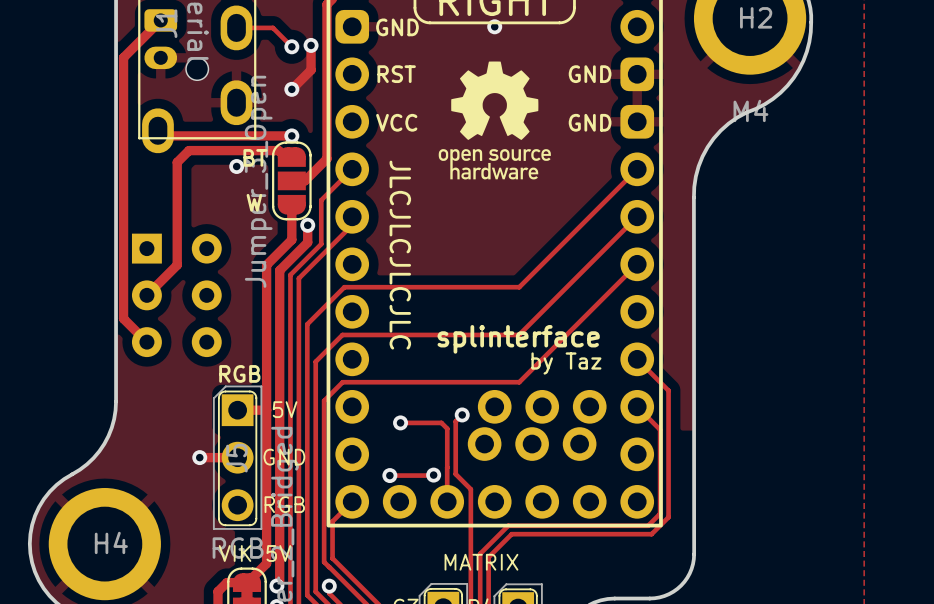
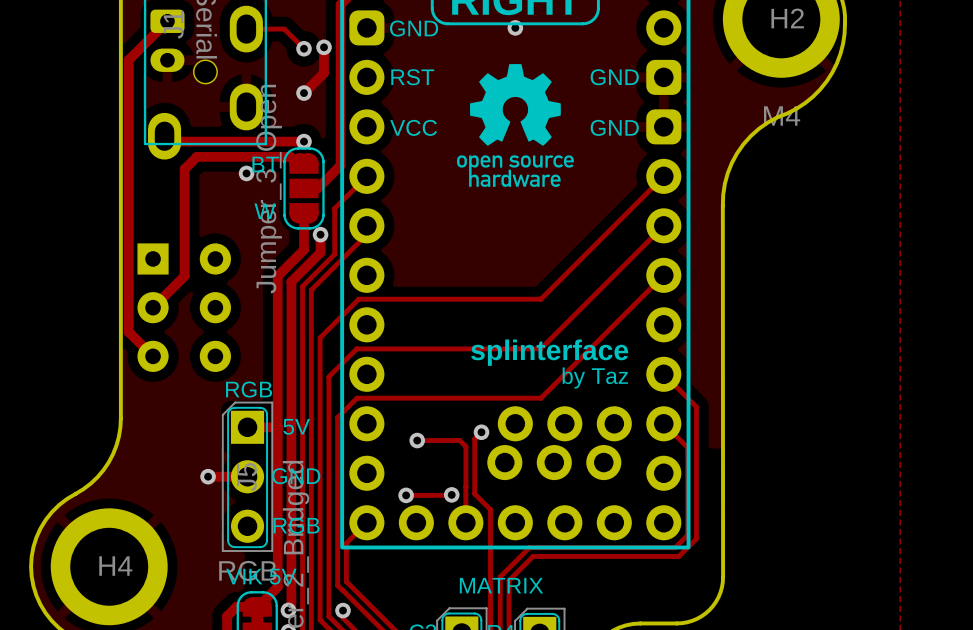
text: JLCJLCJLCJLC (400, 255) -> none

